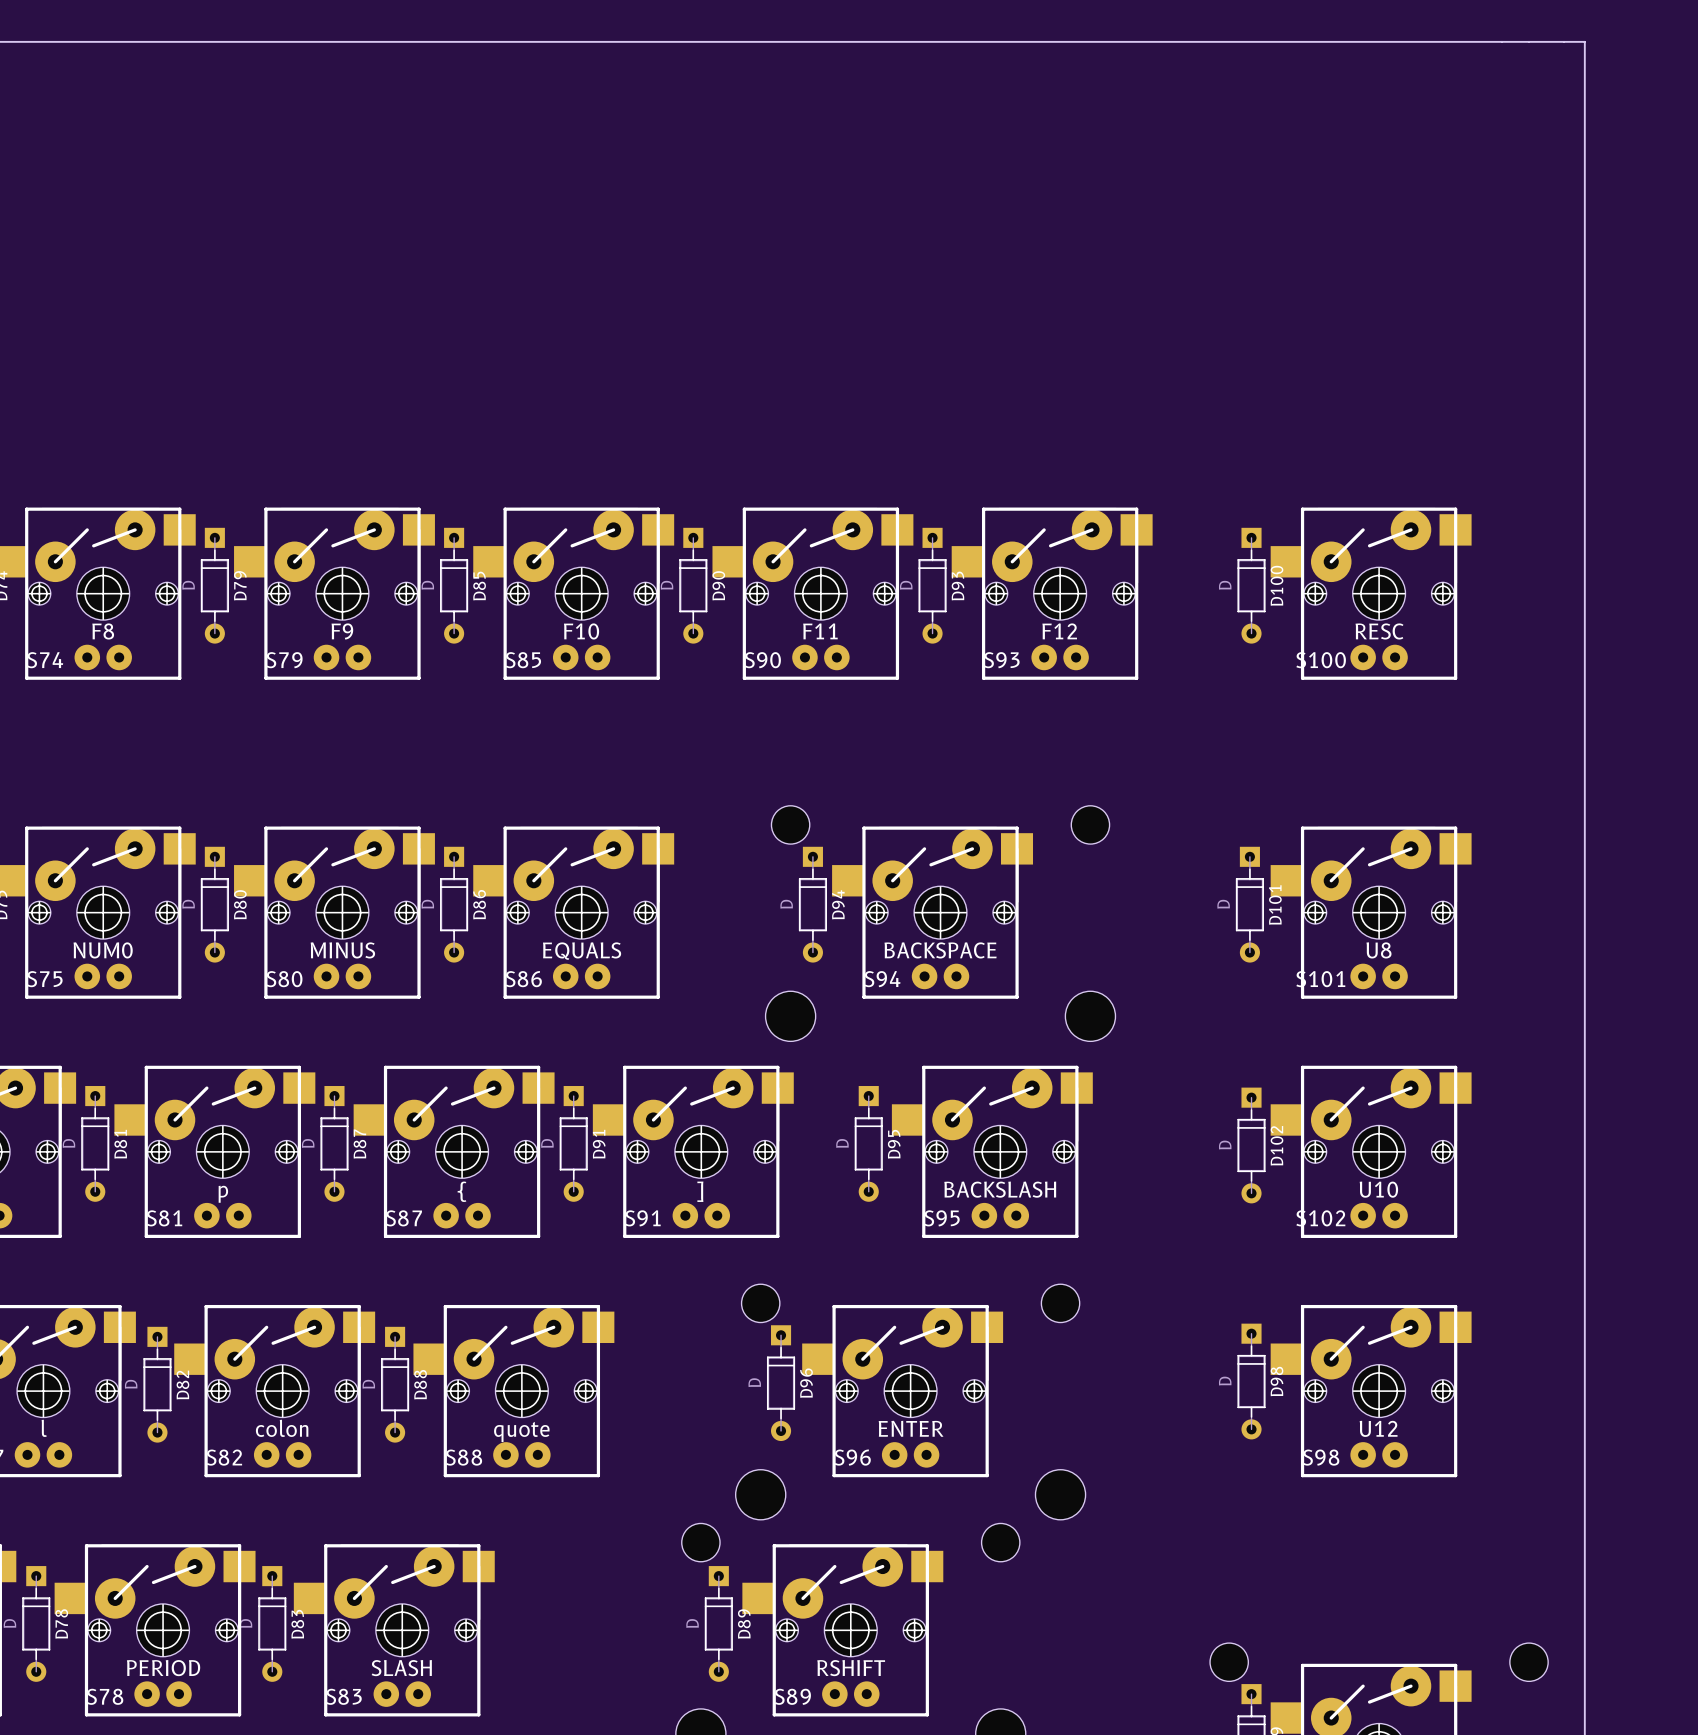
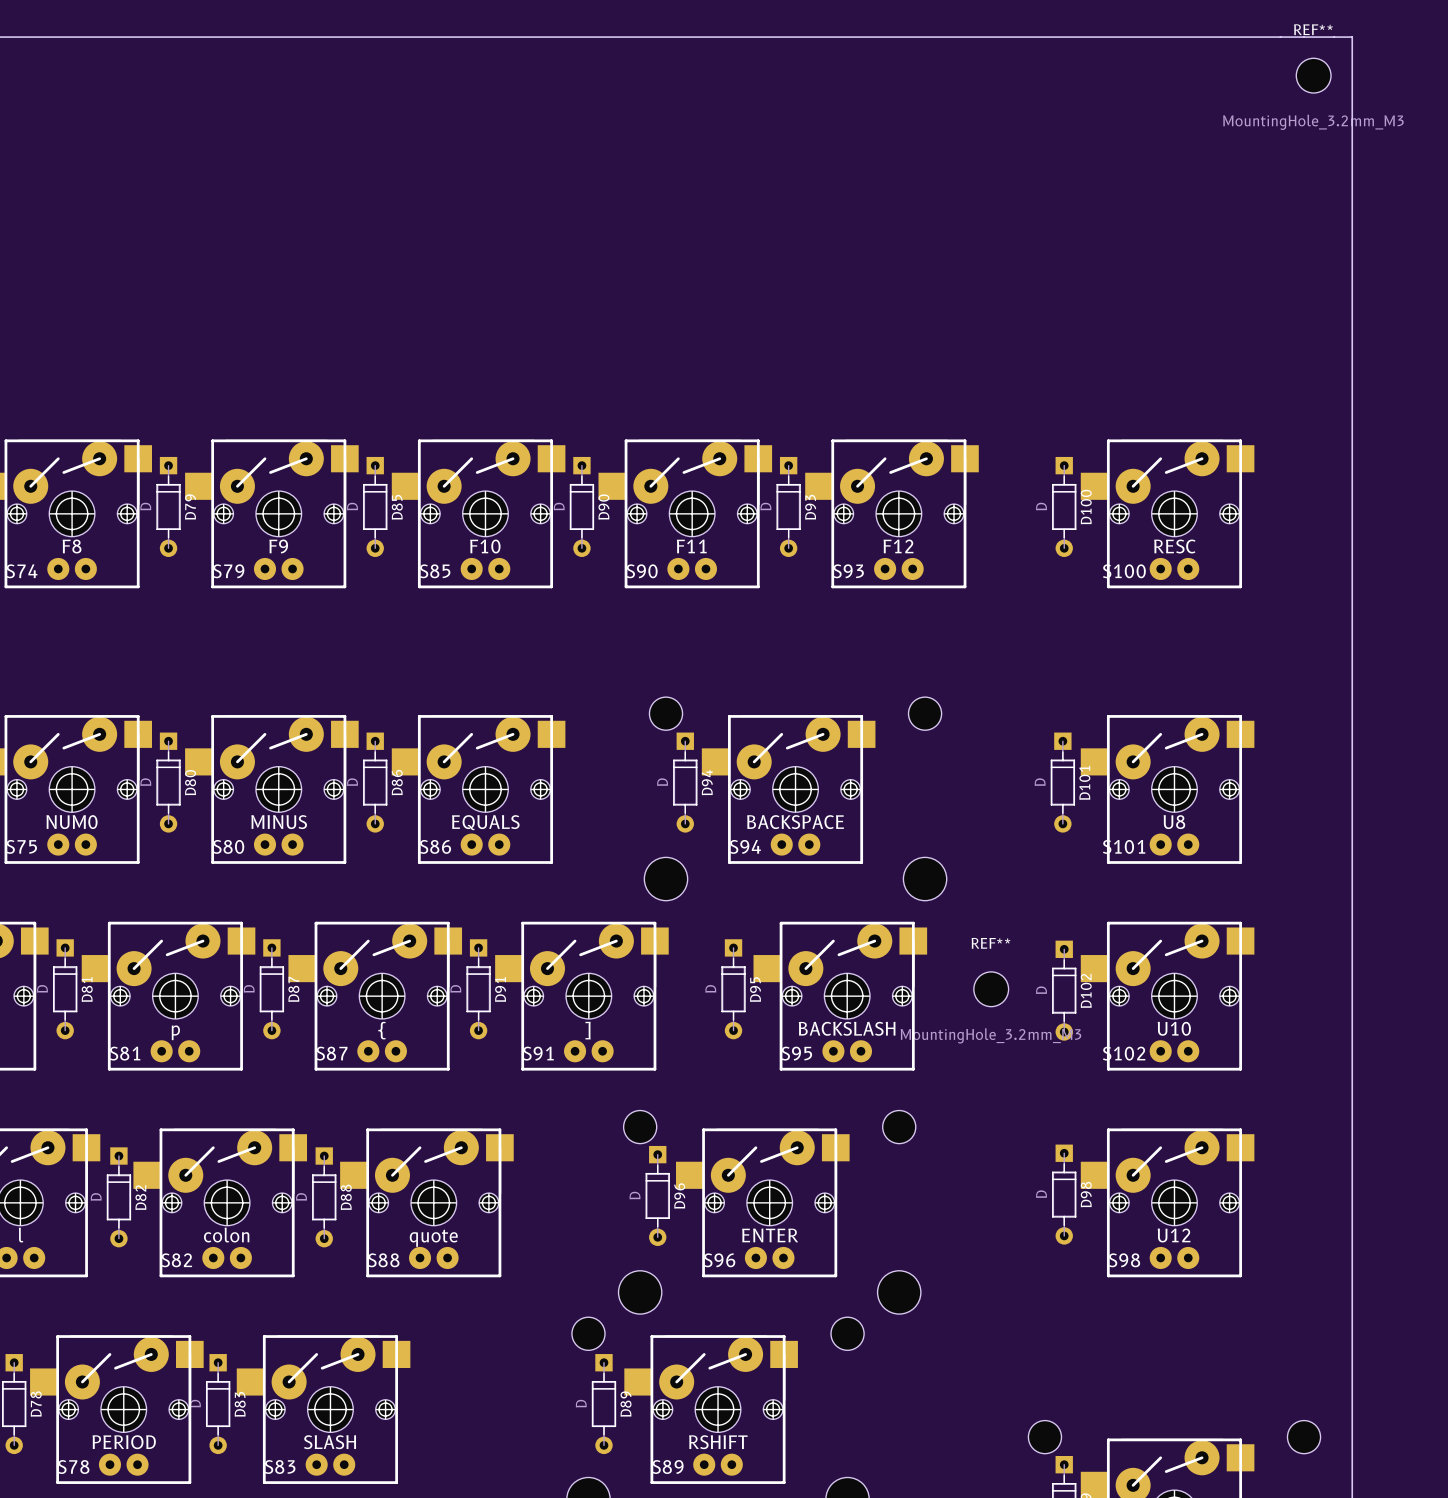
REF**: none -> MountingHole_3.2mm_M3 (1313, 75)
REF**: none -> MountingHole_3.2mm_M3 (991, 989)

